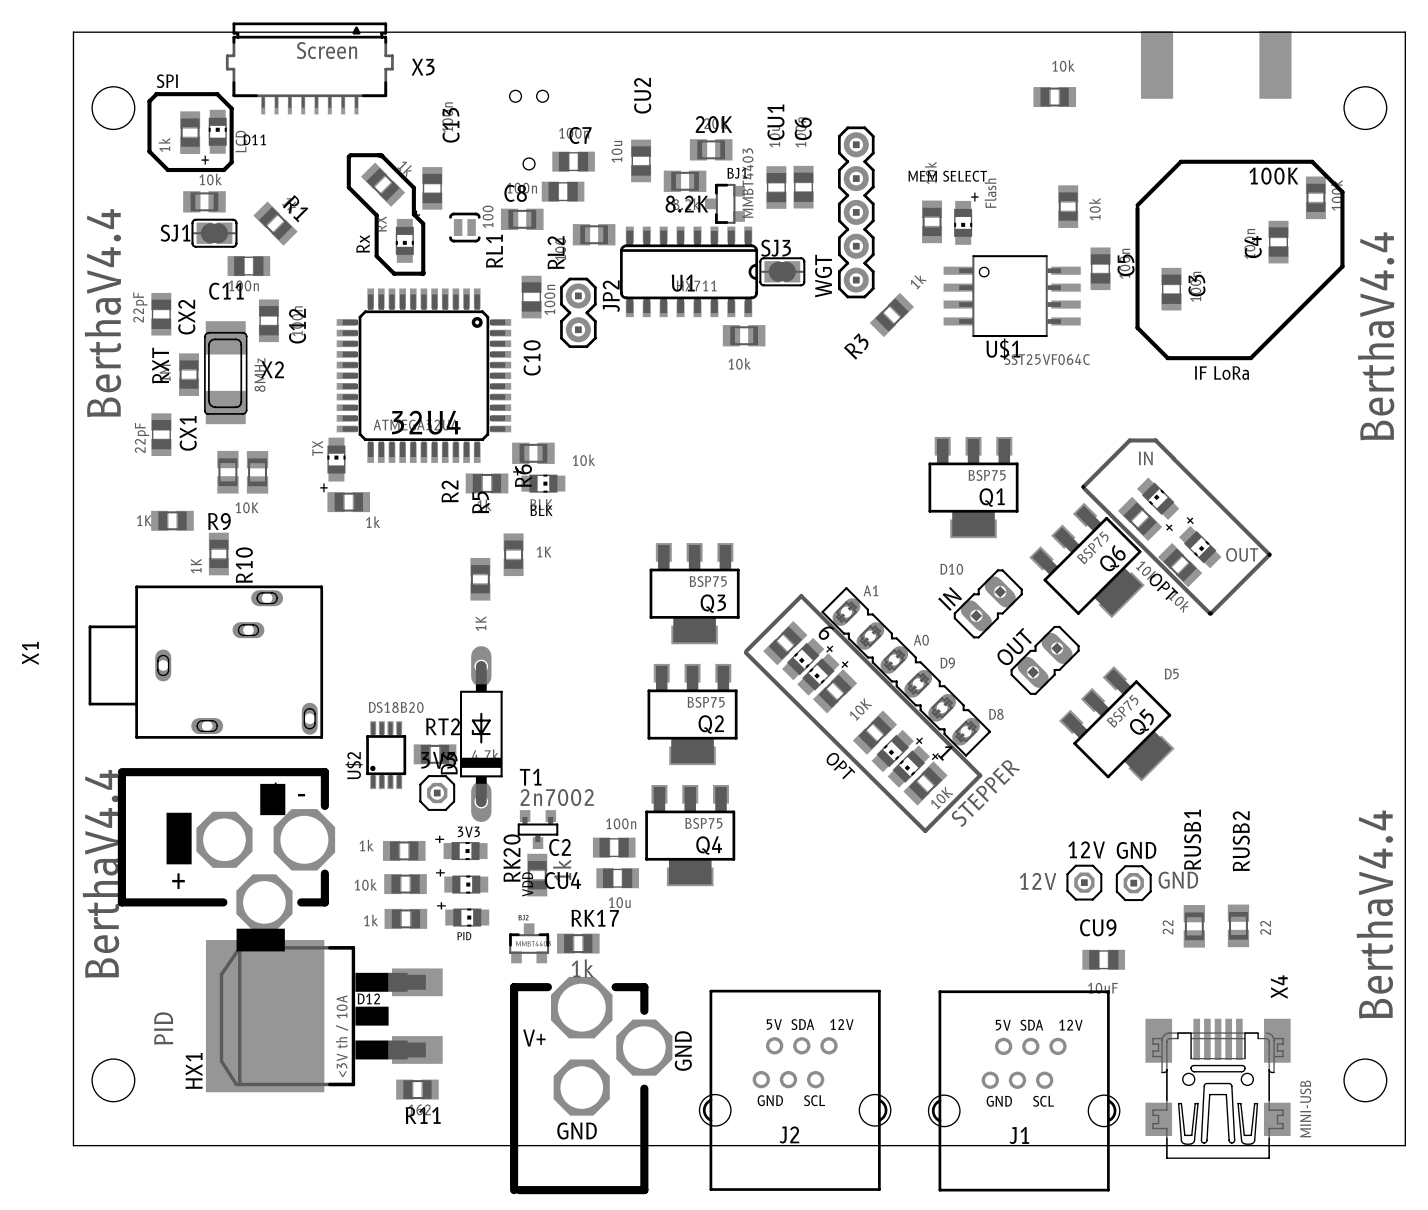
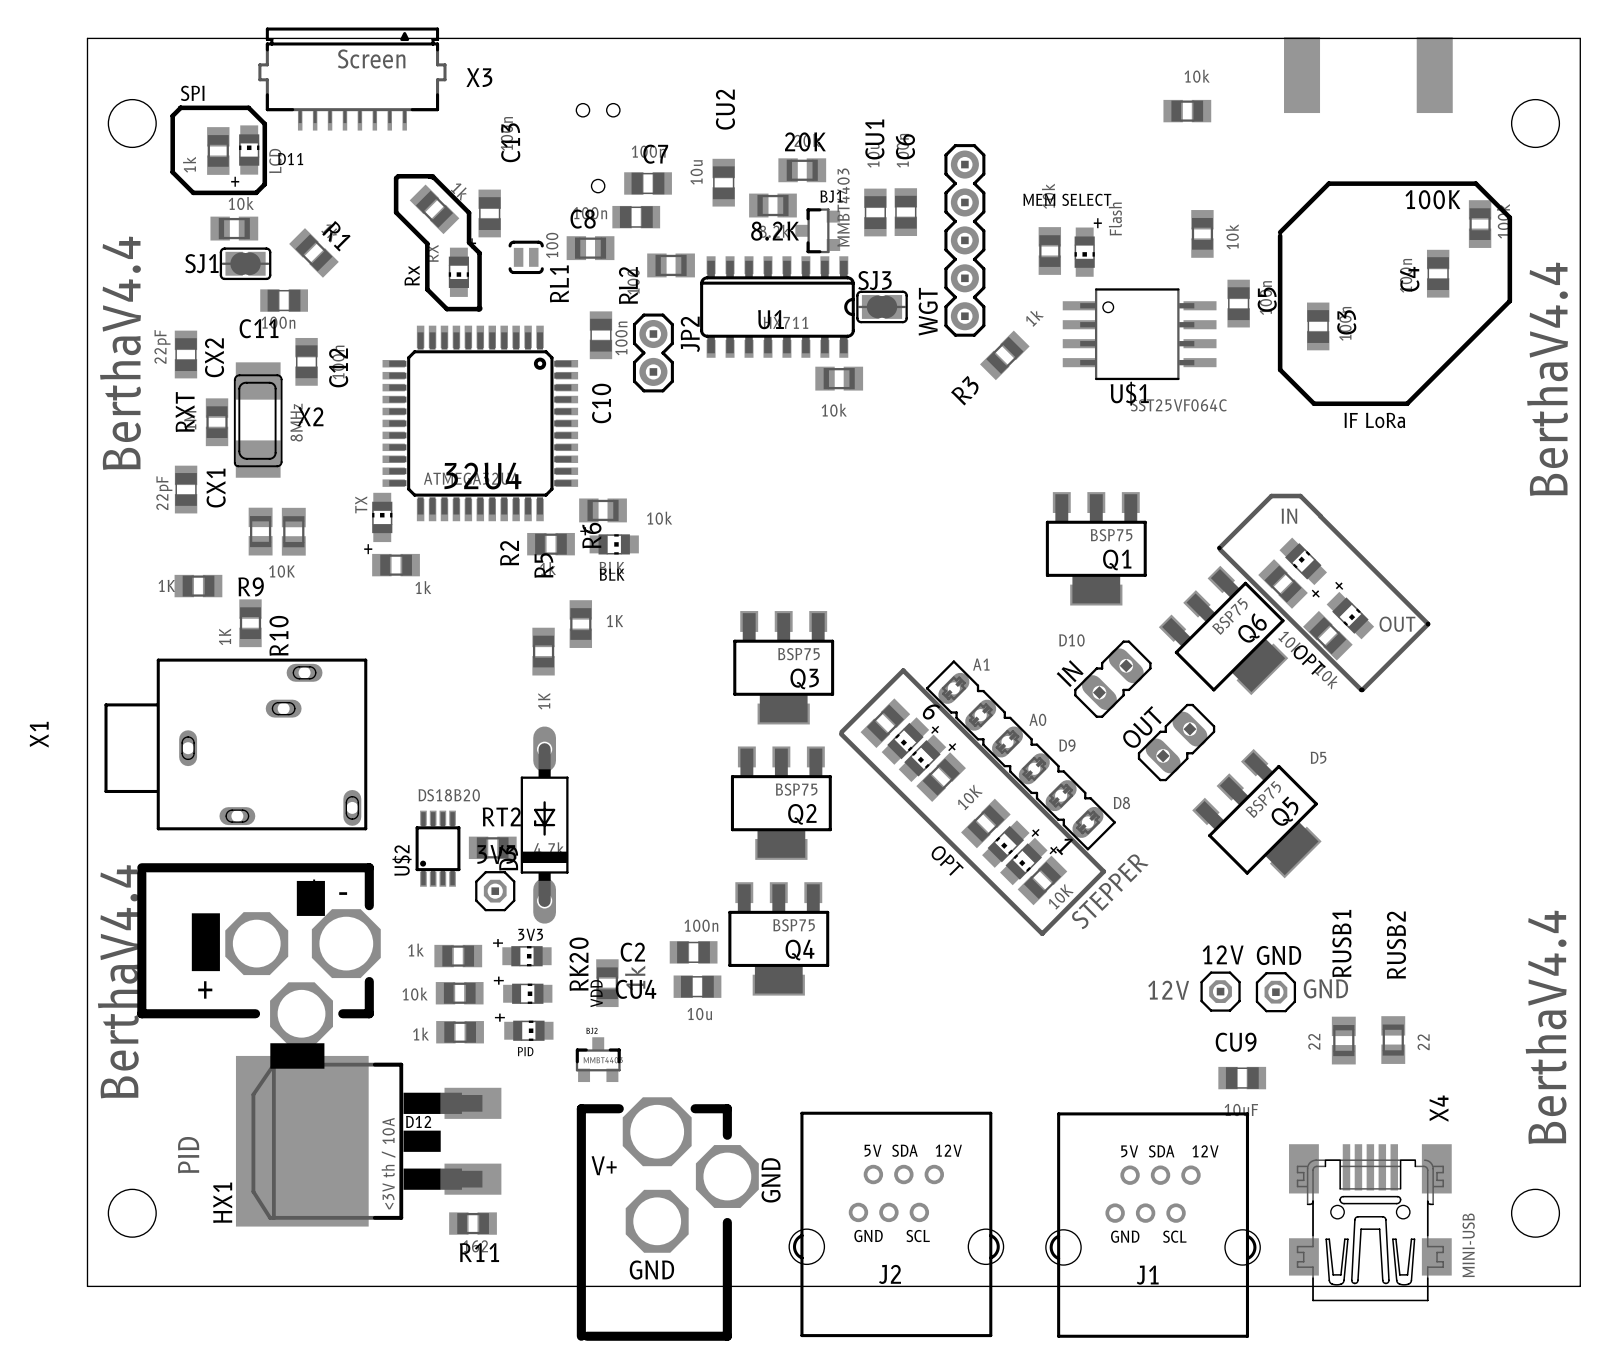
T1: 2n7002 (537, 829) -> none
RK17: 1k (578, 943) -> none

